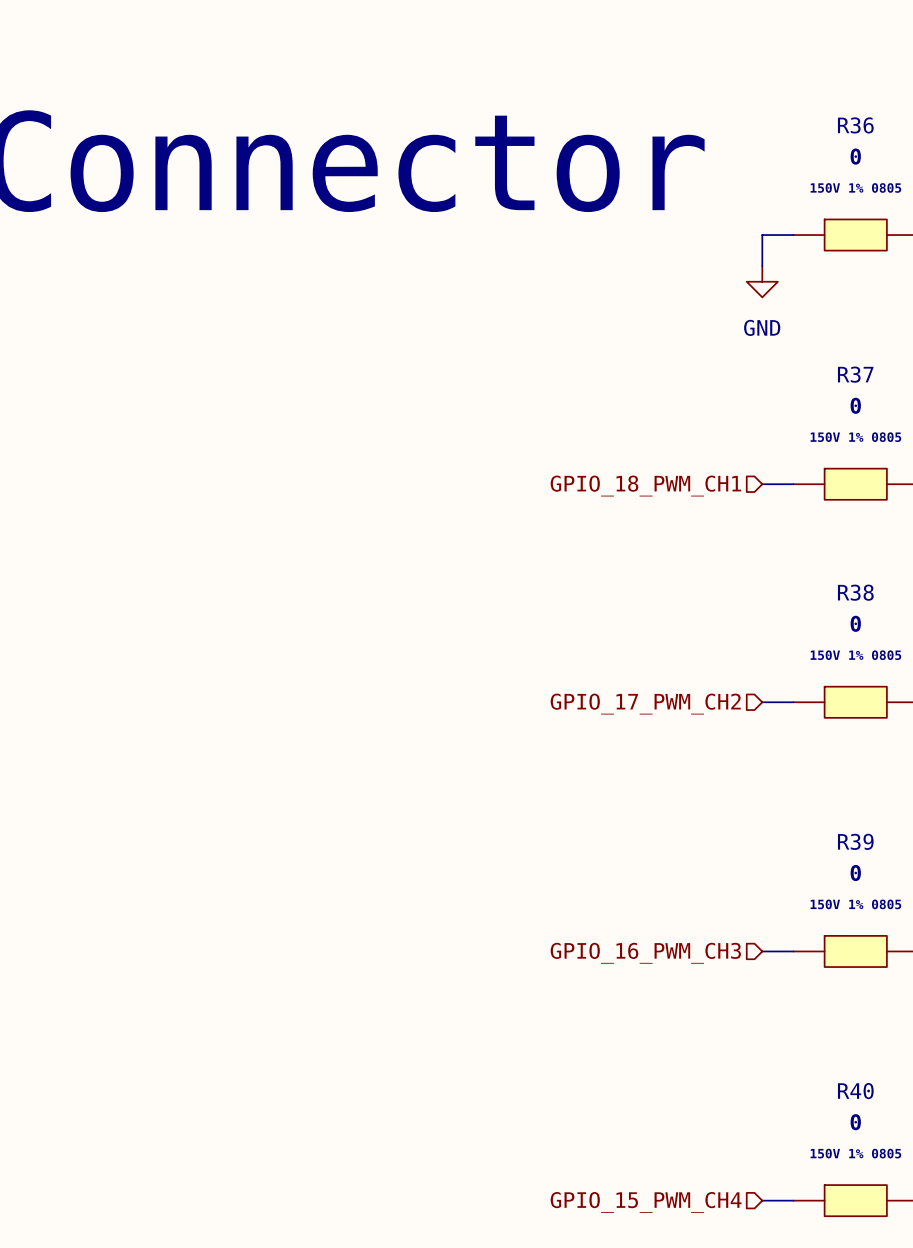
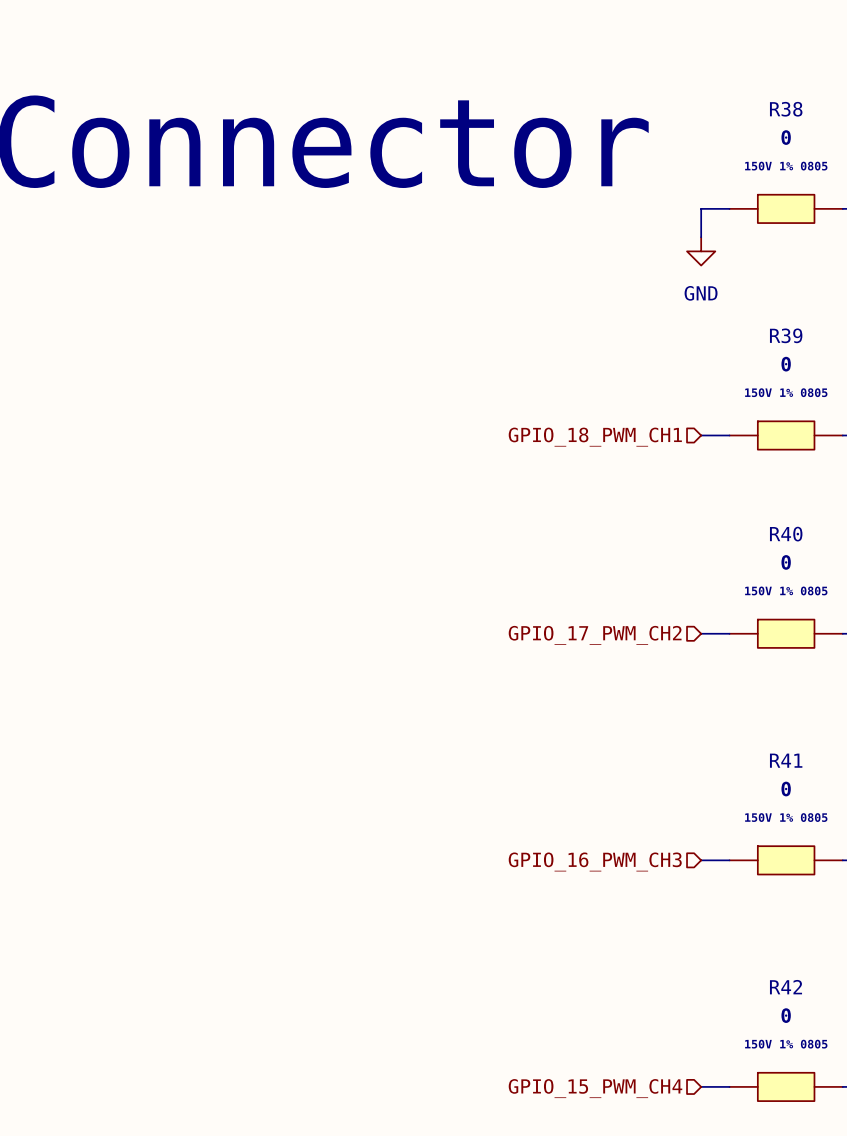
R36 name: R36 (855, 125) -> R38 (786, 109)
R37 name: R37 (855, 374) -> R39 (786, 335)
R38 name: R38 (855, 592) -> R40 (786, 534)
R39 name: R39 (855, 841) -> R41 (786, 760)
R40 name: R40 (855, 1091) -> R42 (786, 987)

